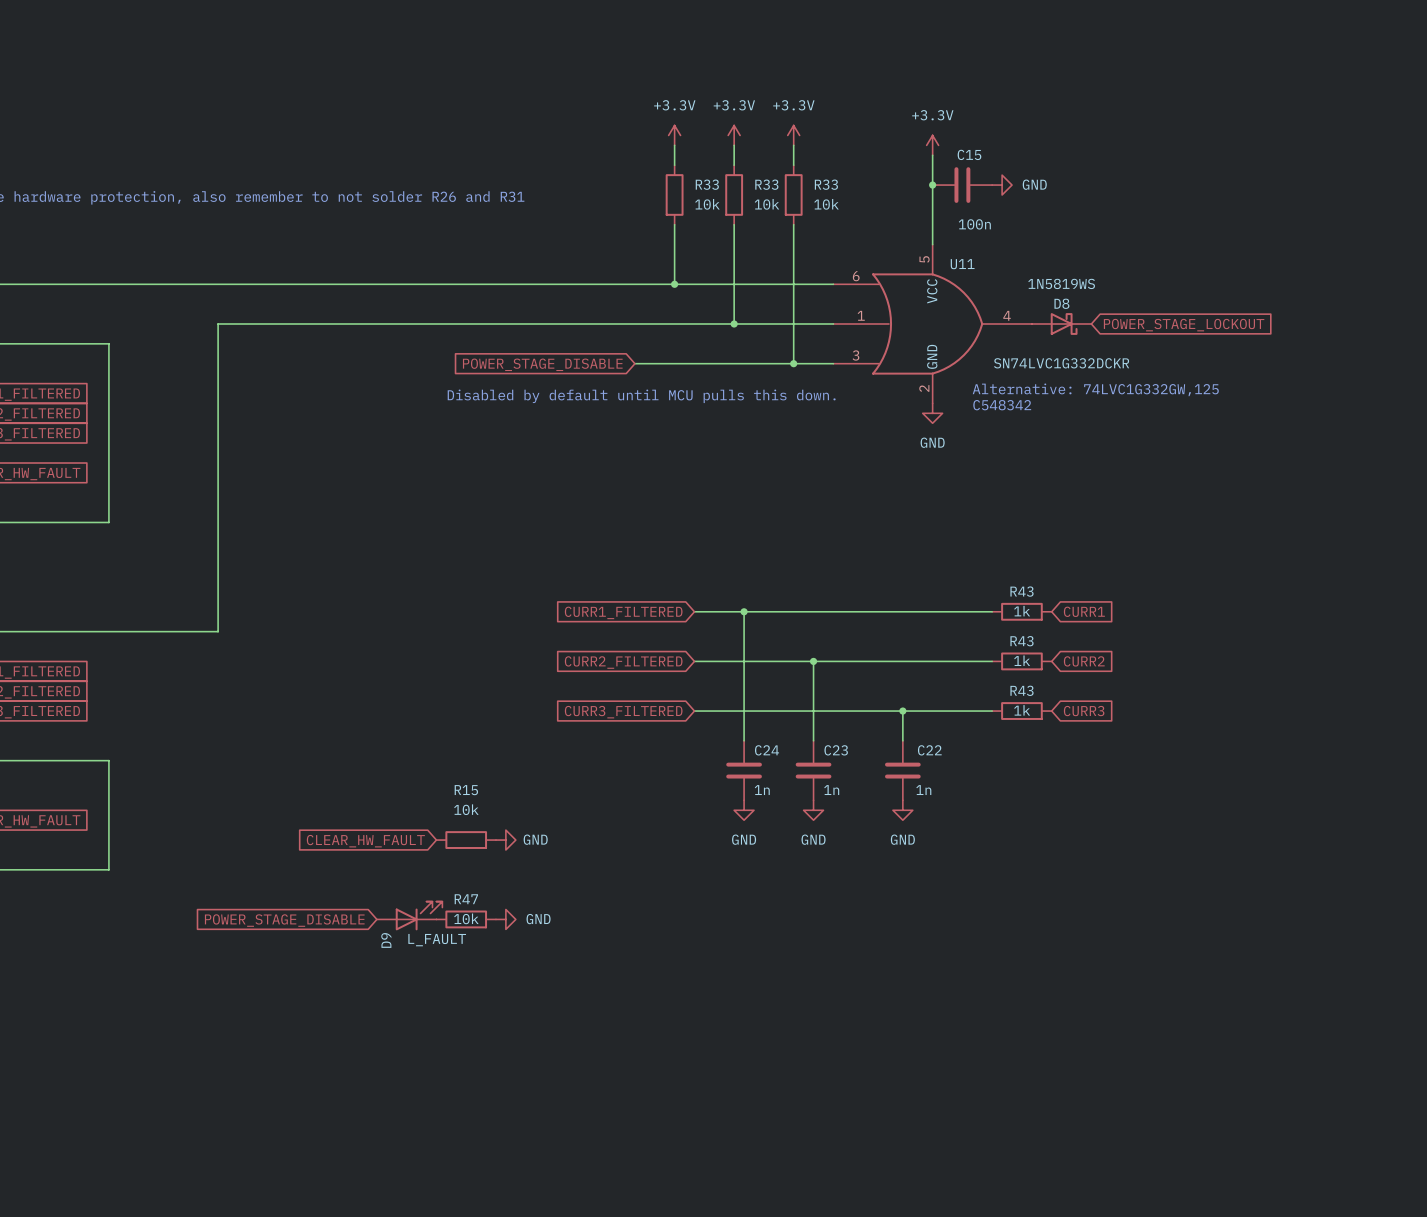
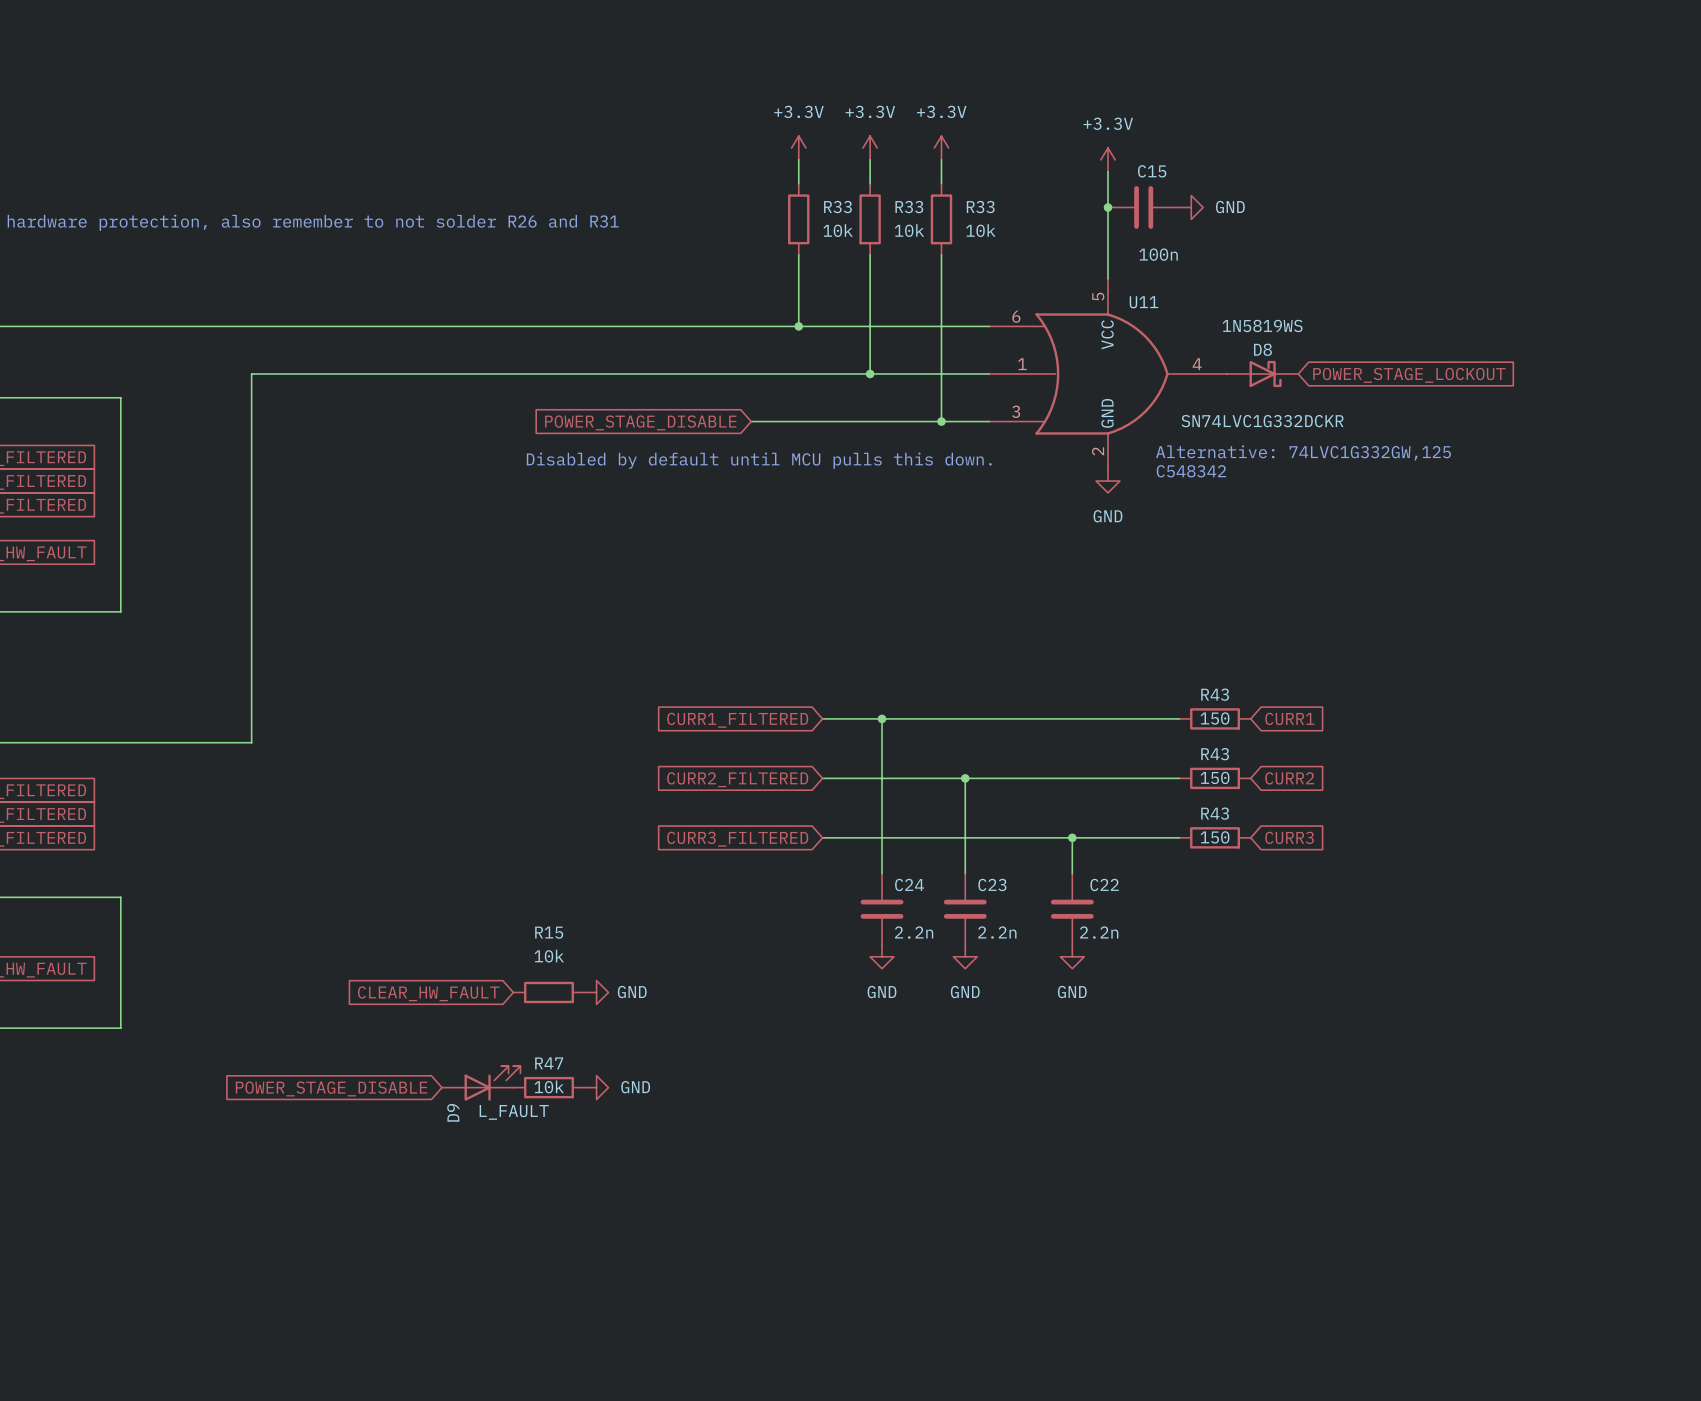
R43 value: 1k (1022, 611) -> 150 (1215, 718)
R43 value: 1k (1022, 660) -> 150 (1215, 777)
R43 value: 1k (1022, 710) -> 150 (1215, 837)
C24 value: 1n (762, 790) -> 2.2n (914, 932)
C23 value: 1n (831, 790) -> 2.2n (997, 932)
C22 value: 1n (923, 790) -> 2.2n (1099, 932)

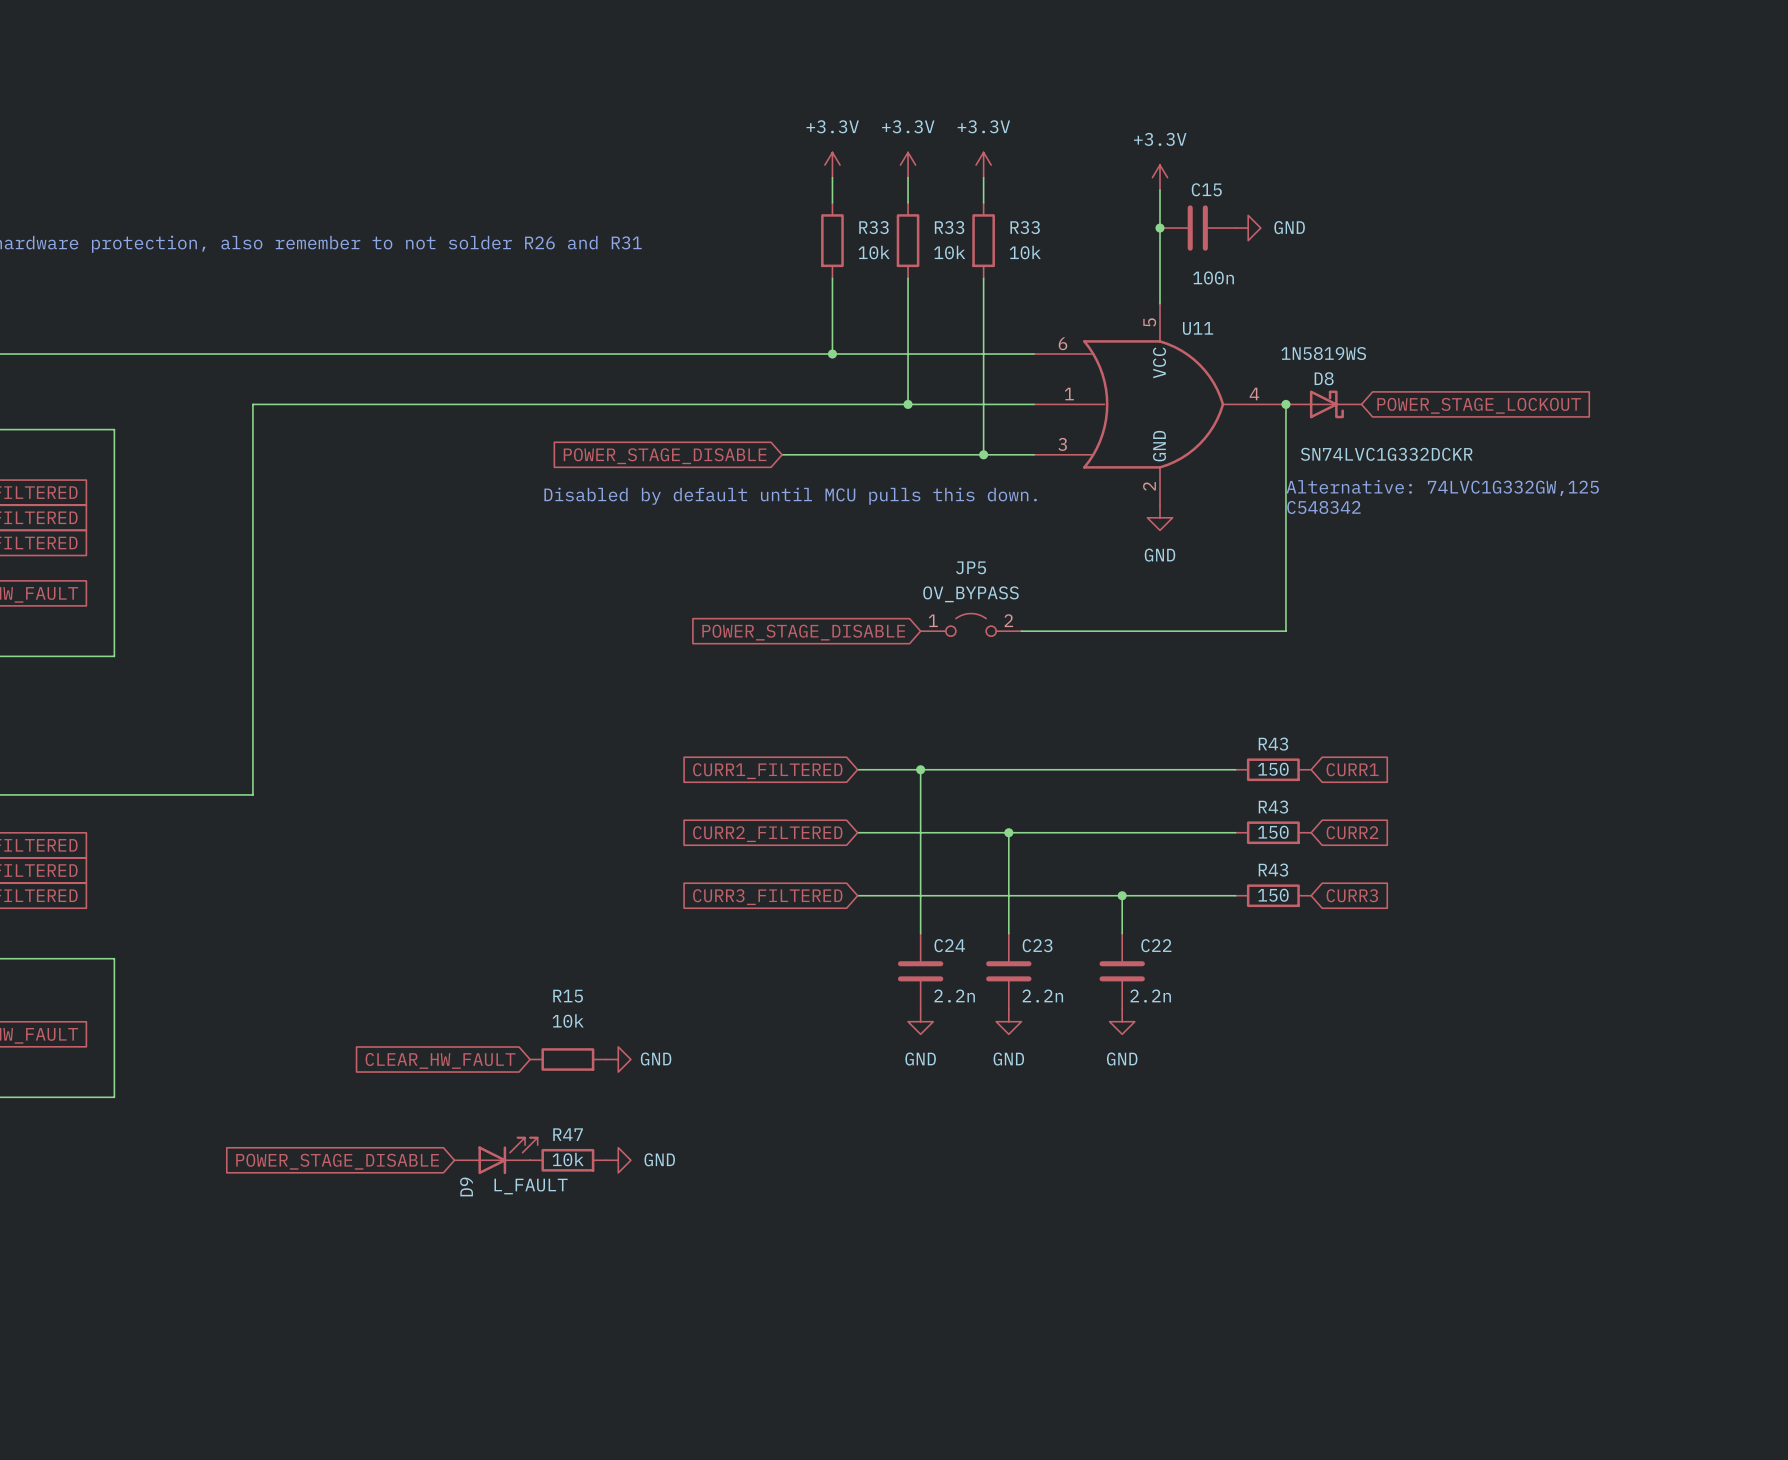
wire: none -> (1285, 404) (1285, 631) (1021, 631)
junction: none -> (1285, 404)
U11 value position: SN74LVC1G332DCKR (1262, 421) -> SN74LVC1G332DCKR (1386, 454)
text position: Alternative: 74LVC1G332GW,125 (1303, 452) -> Alternative: 74LVC1G332GW,125 (1442, 488)
text position: C548342 (1191, 471) -> C548342 (1323, 507)
JP5: none -> OV_BYPASS (971, 624)
global label: none -> POWER_STAGE_DISABLE (803, 632)

